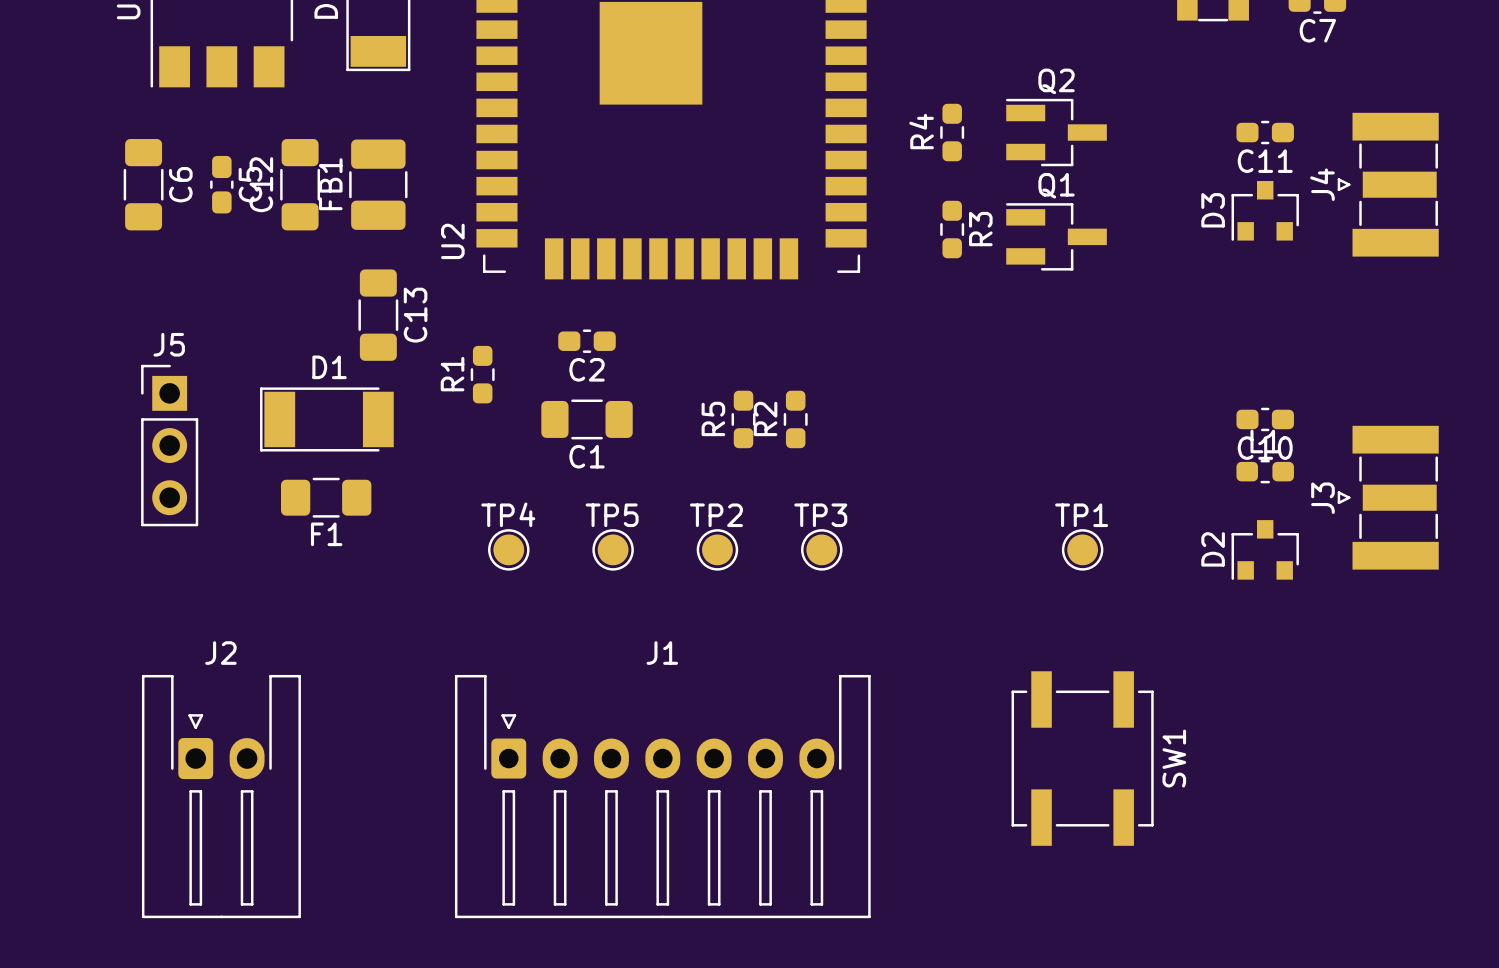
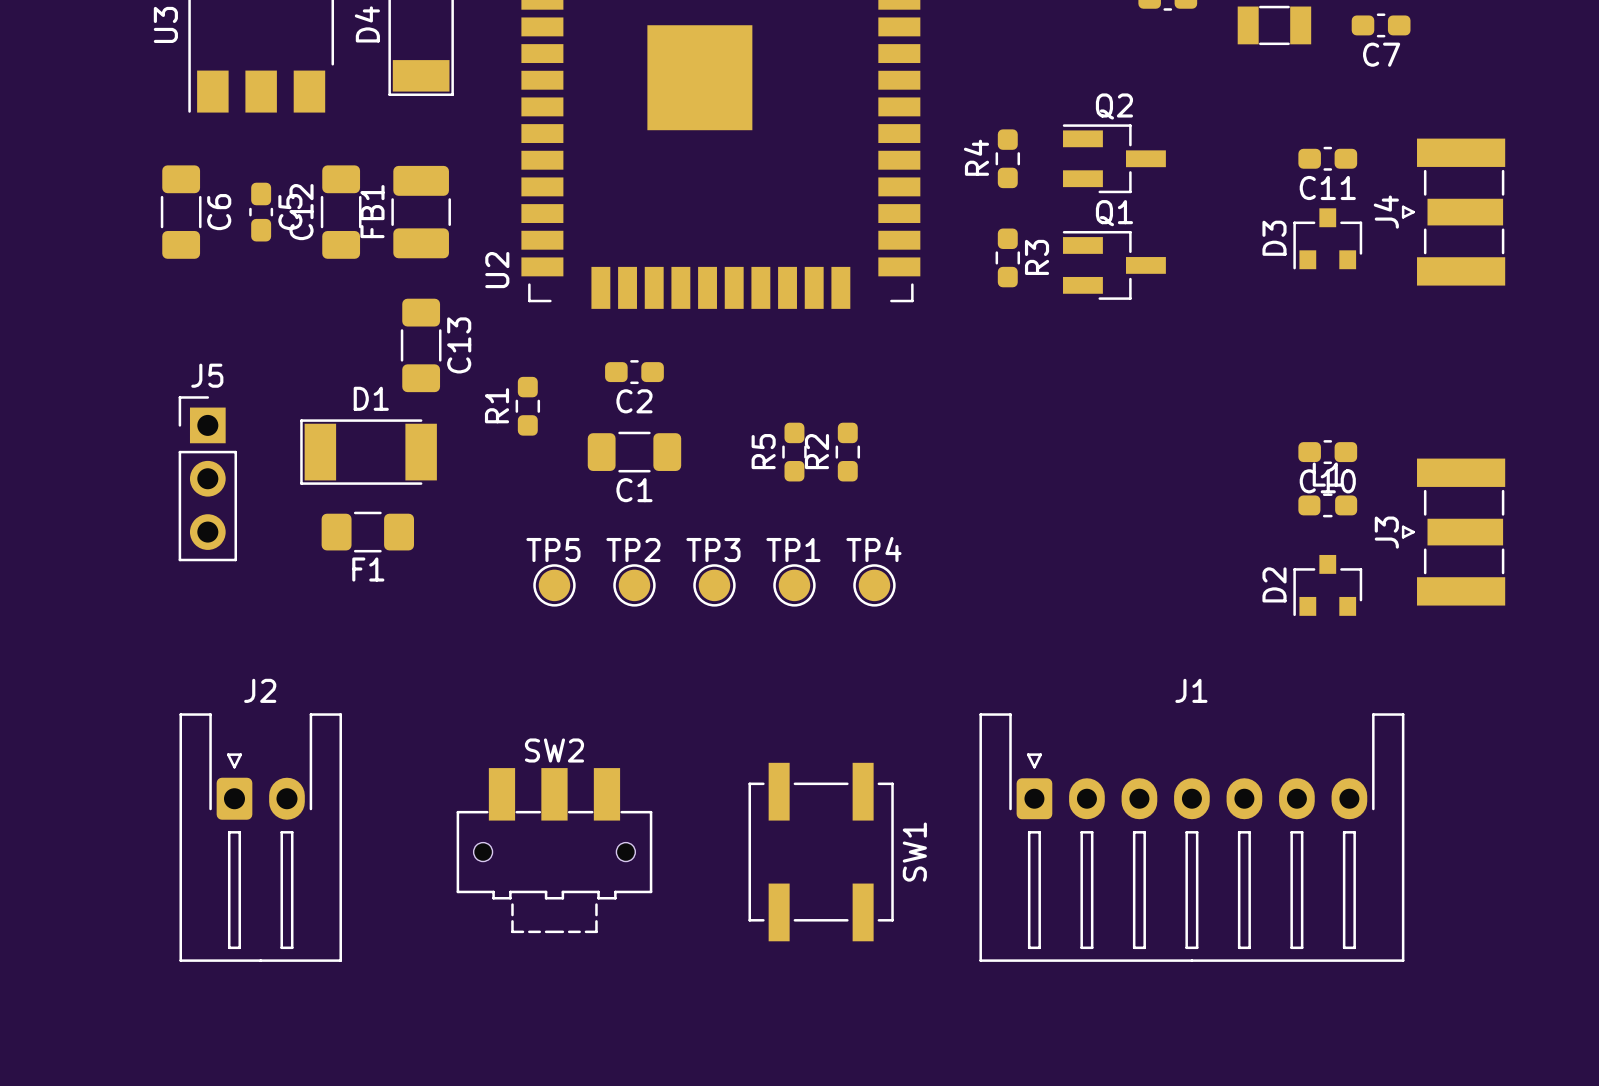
TP4 name: TP4 (508, 514) -> TP5 (553, 550)
TP3 name: TP3 (820, 515) -> TP4 (873, 549)
TP5: (613, 549) -> none
TP3: none -> (714, 585)
TP2 position: (717, 549) -> (634, 585)
TP1 position: (1082, 549) -> (794, 585)
SW1 position: (1082, 758) -> (821, 852)
J1 position: (662, 796) -> (1191, 837)
SW2: none -> (554, 850)

